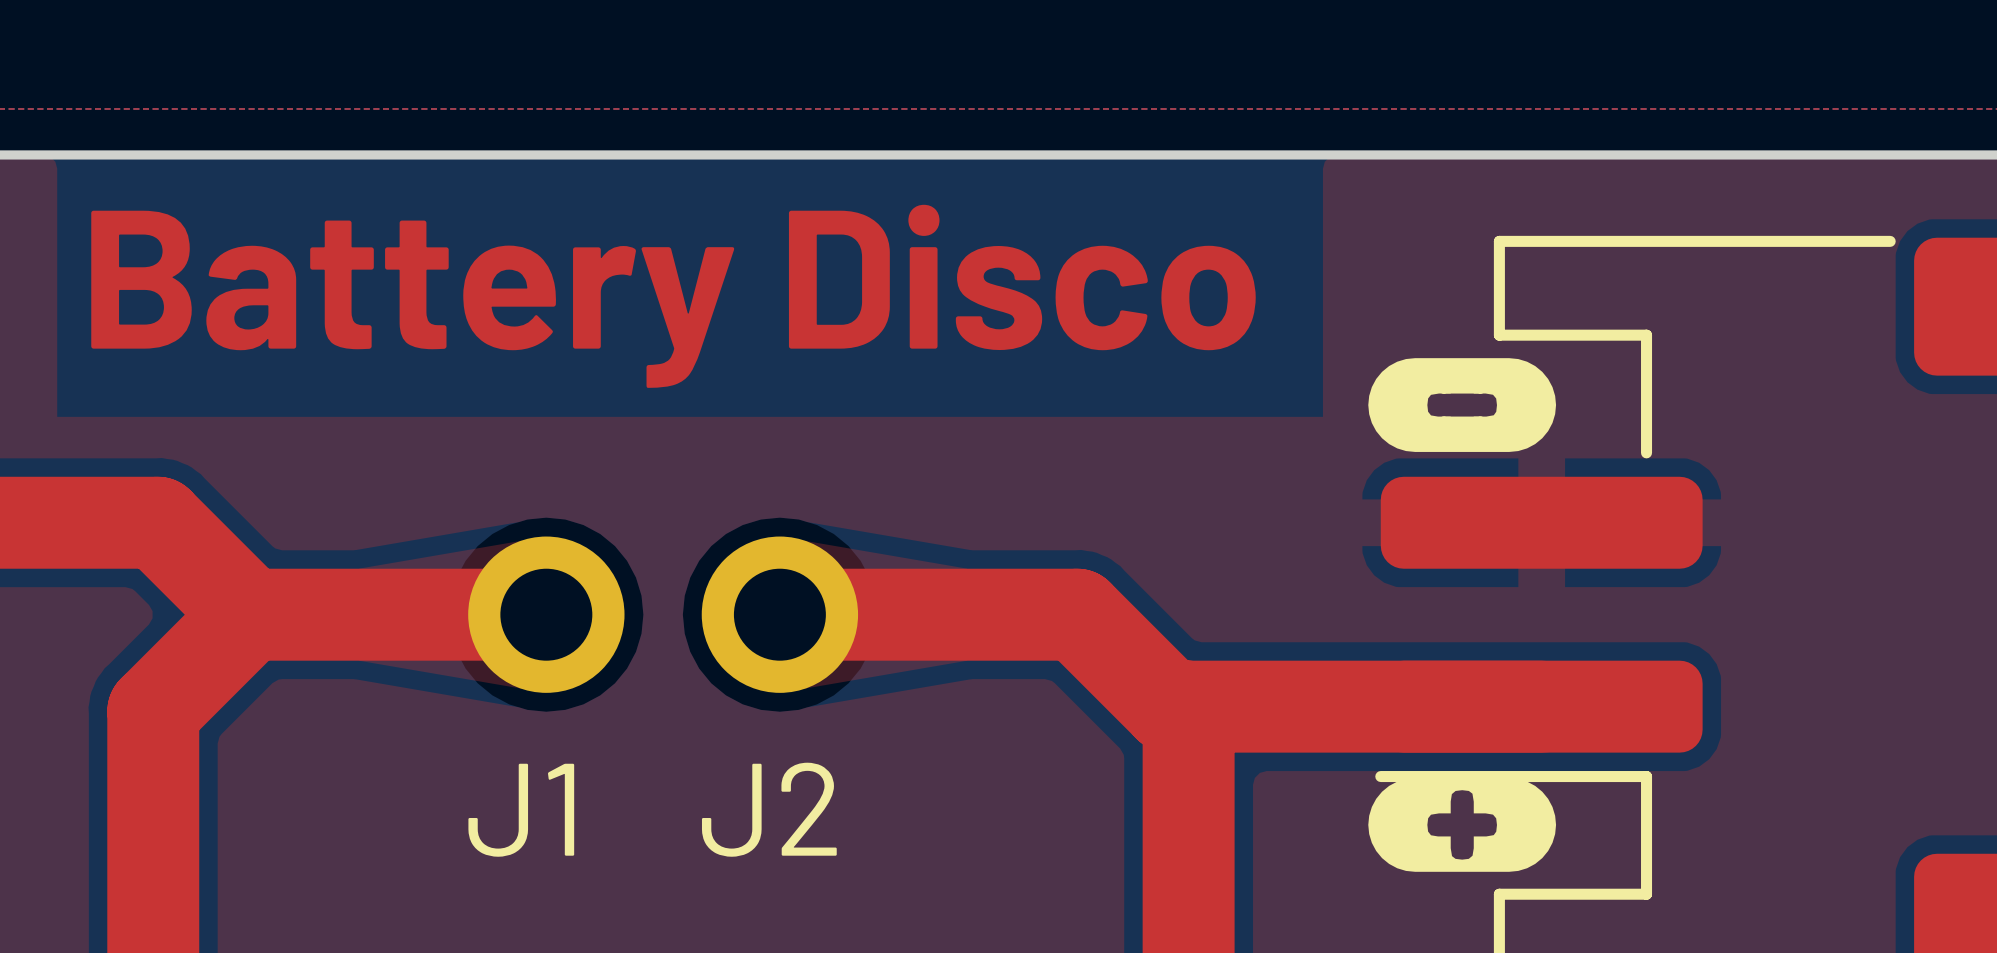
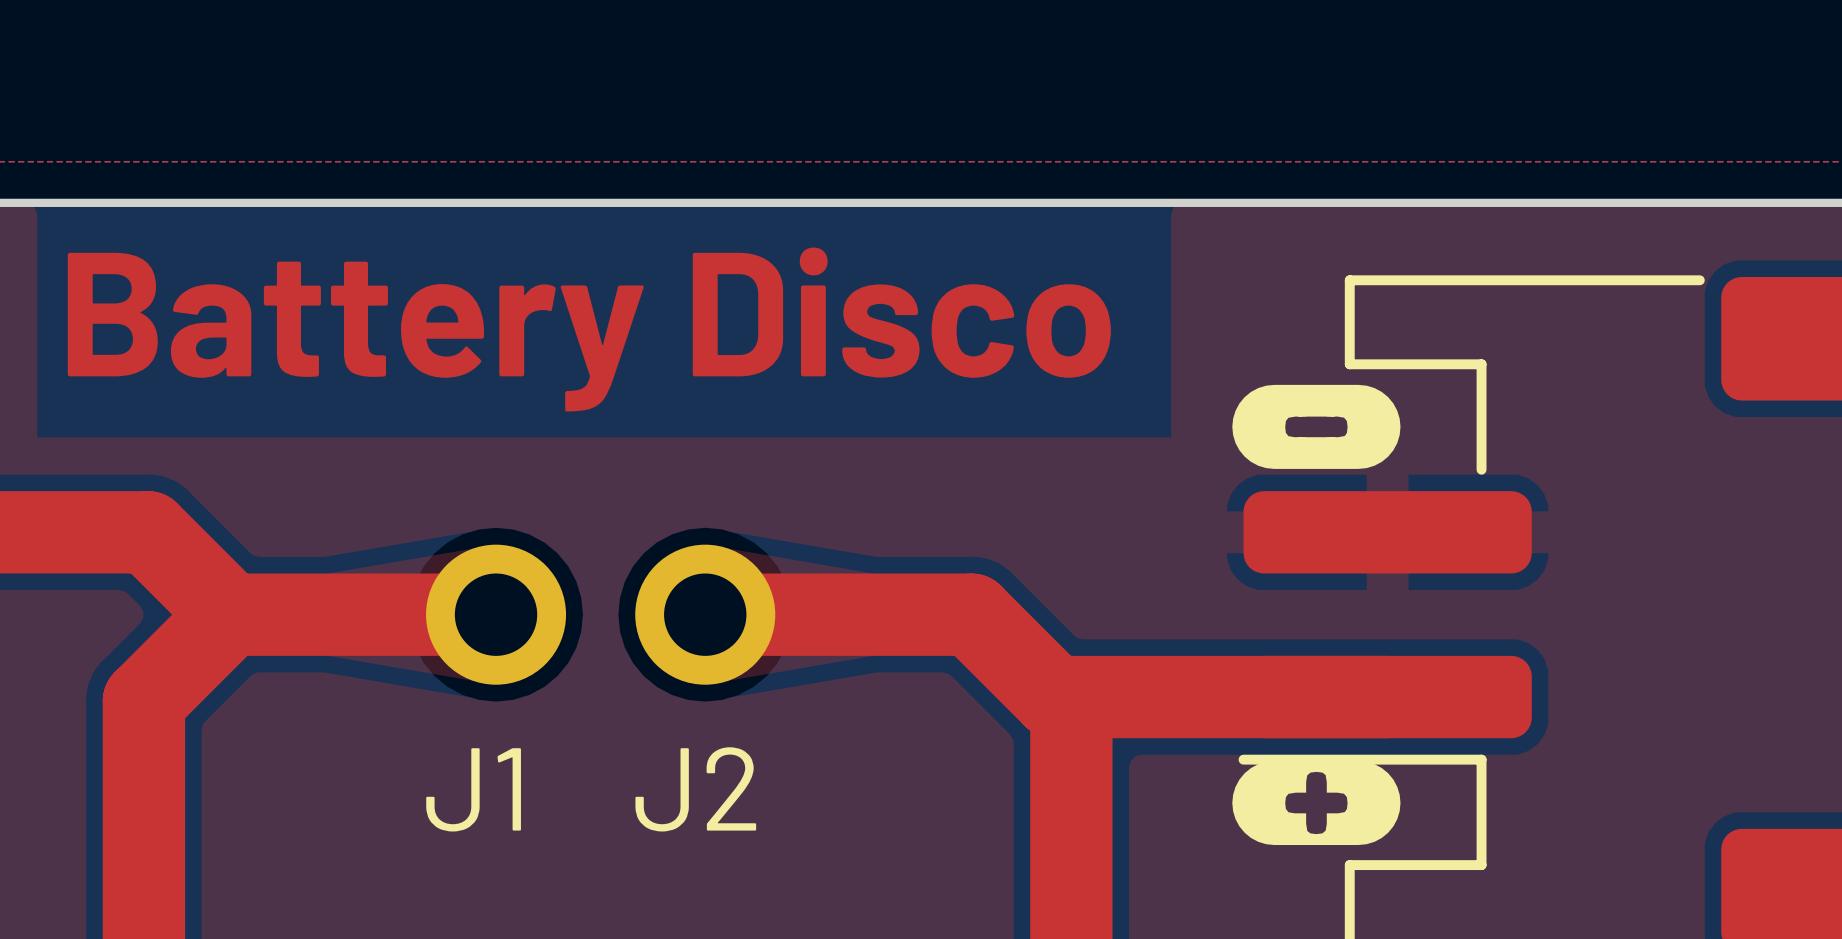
text position: Battery Disco (673, 296) -> Battery Disco (589, 329)

